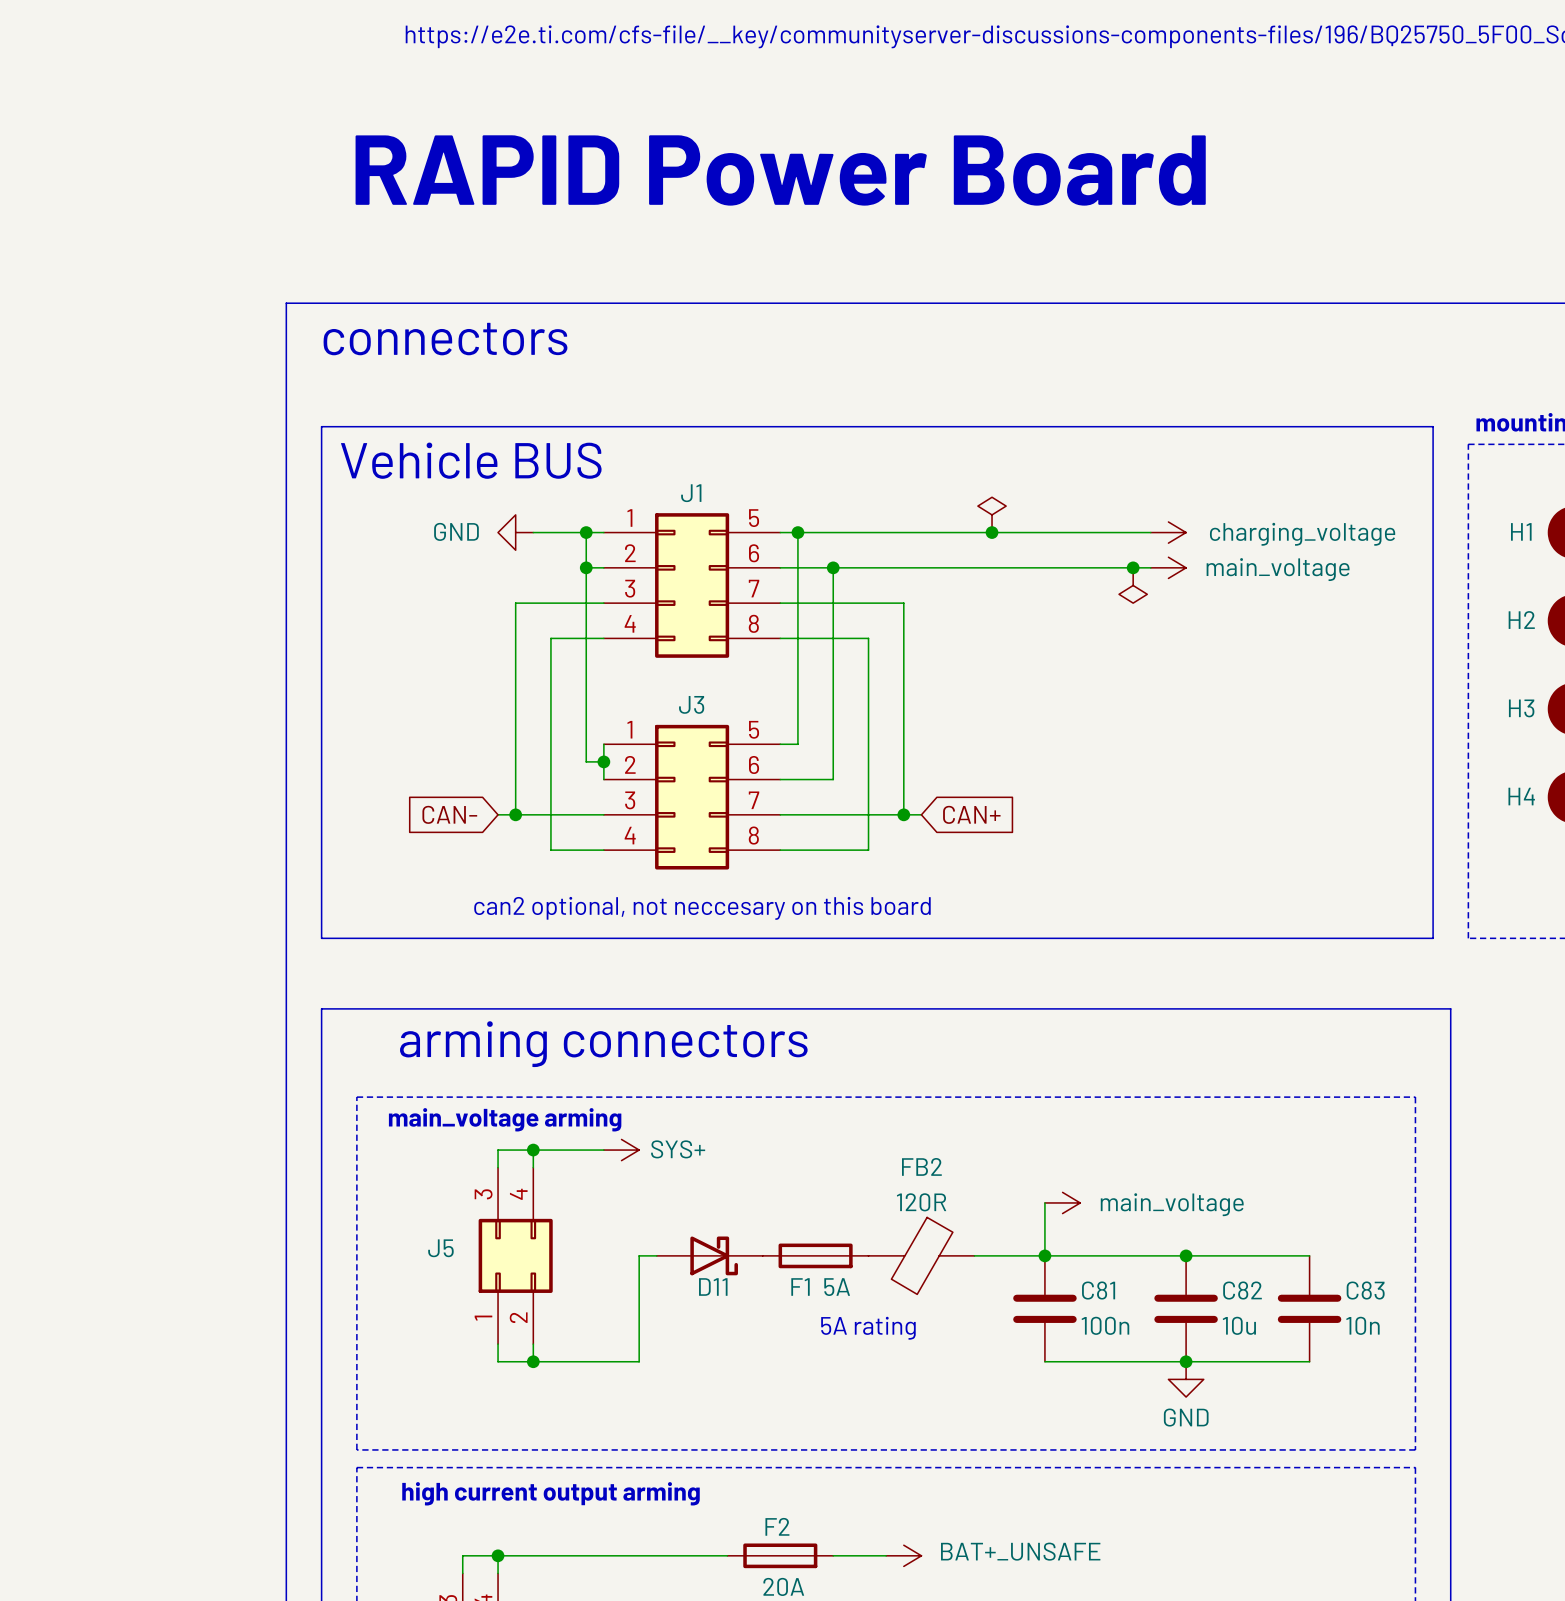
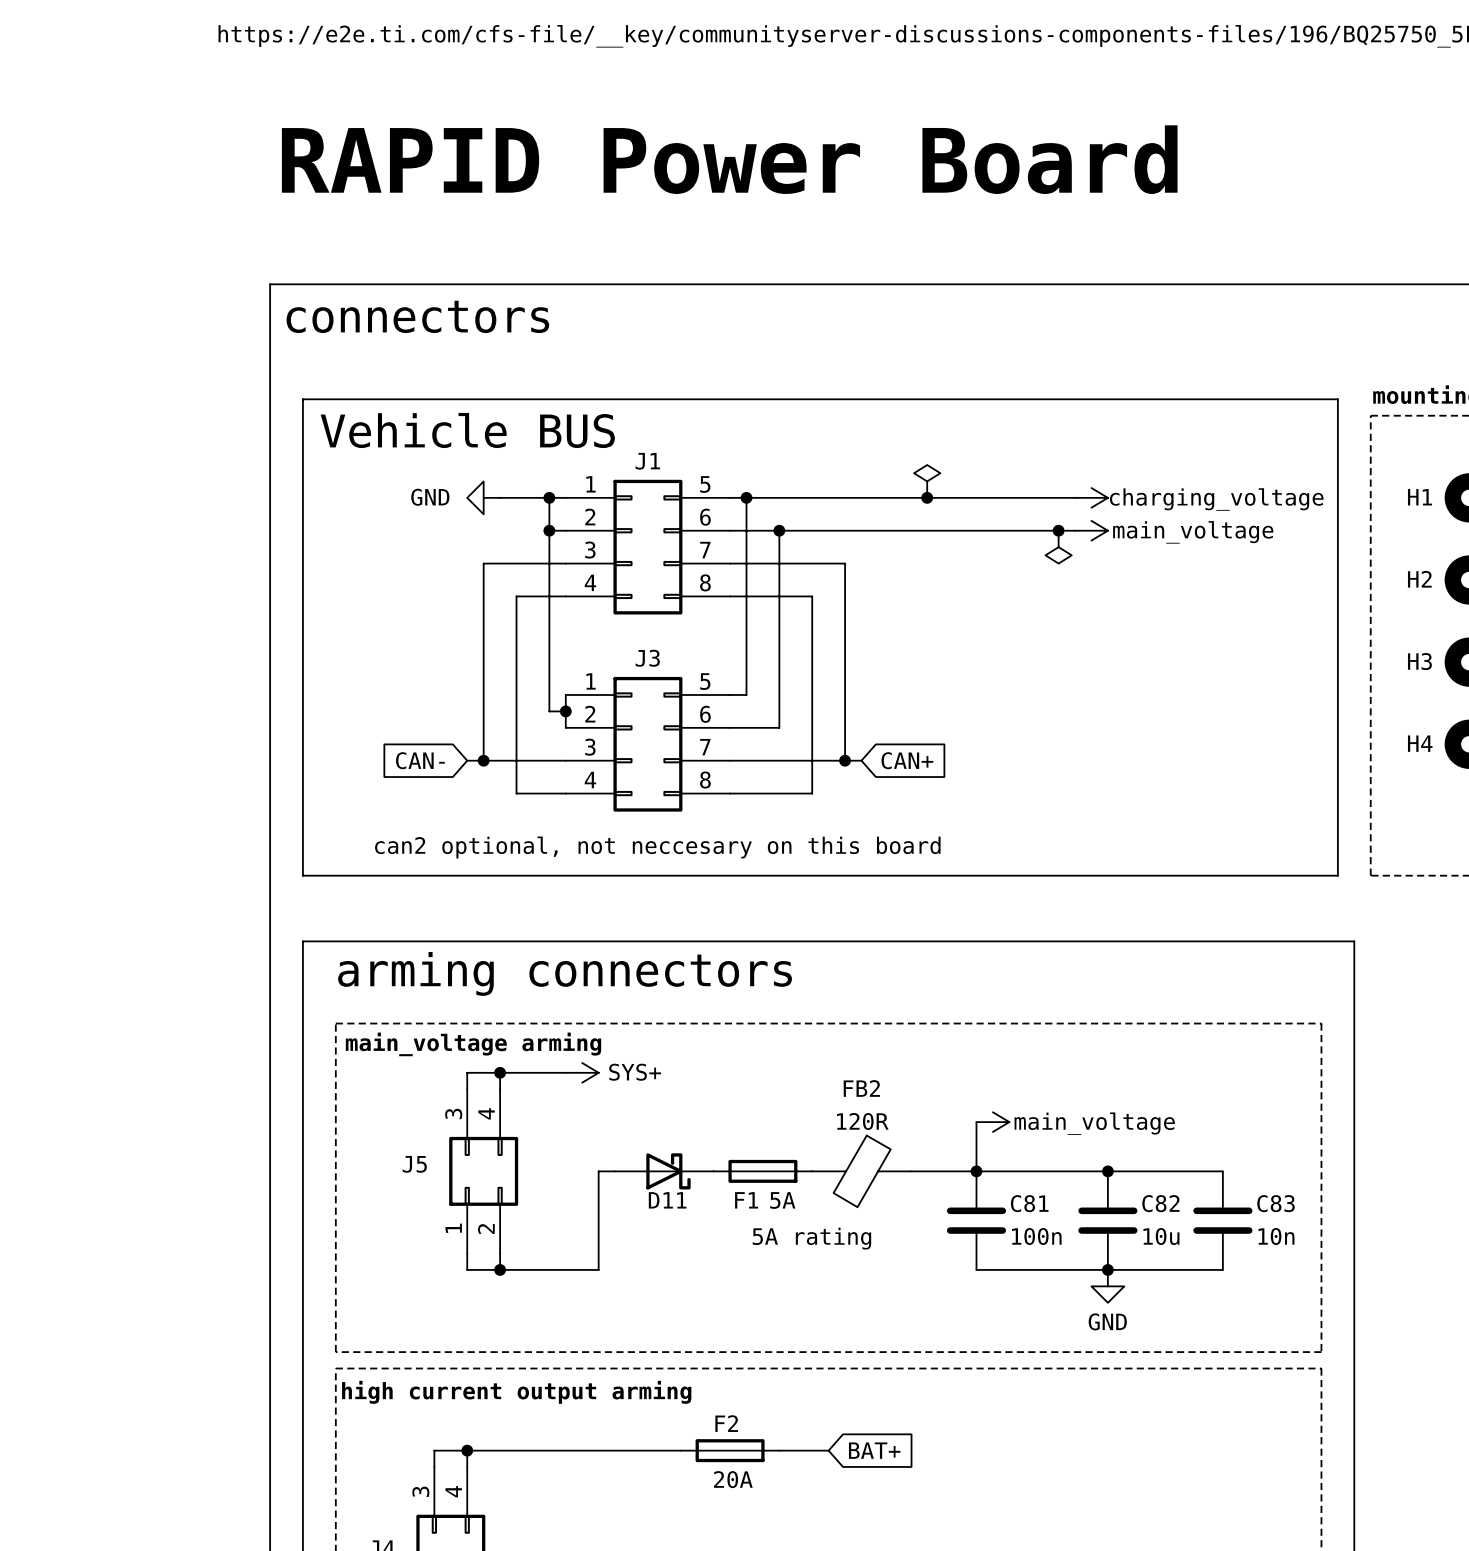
power symbol: BAT+_UNSAFE (903, 1555) -> none
global label: none -> BAT+ (874, 1450)

